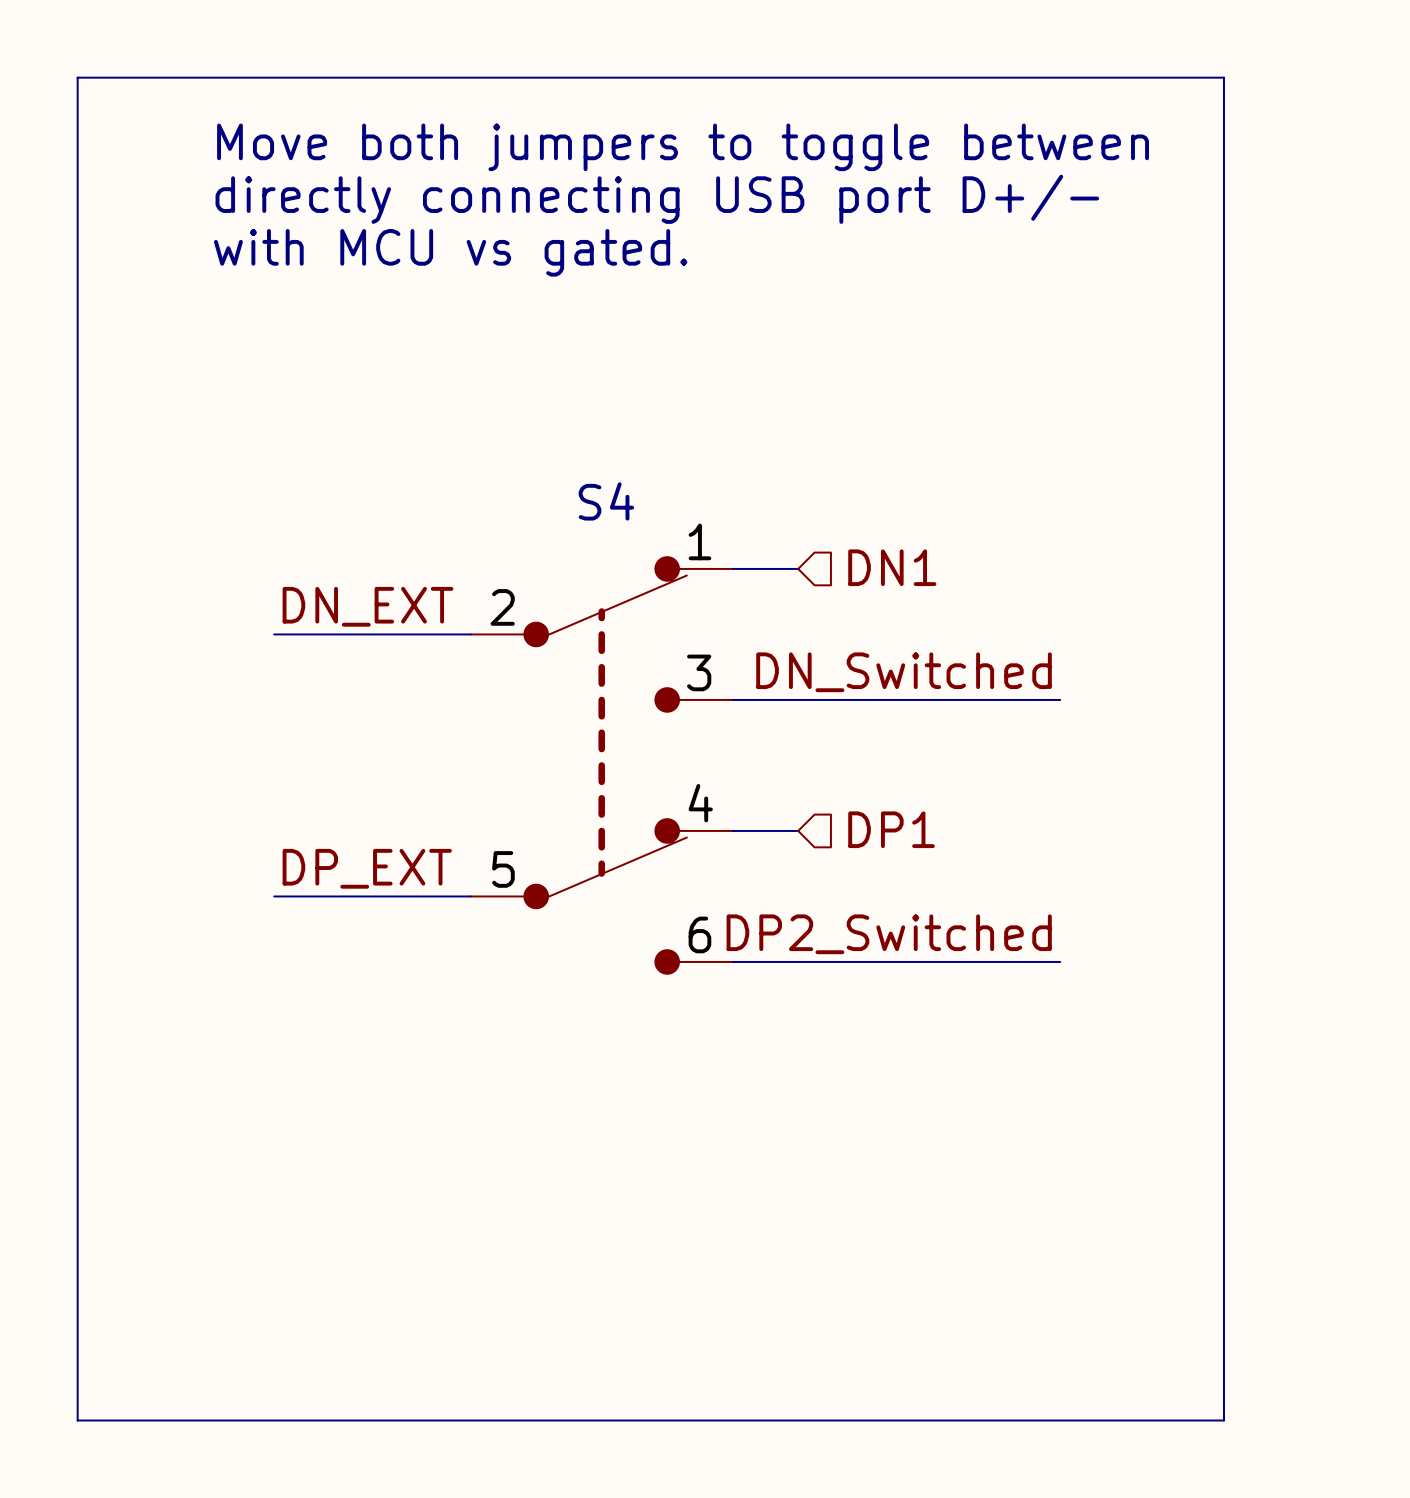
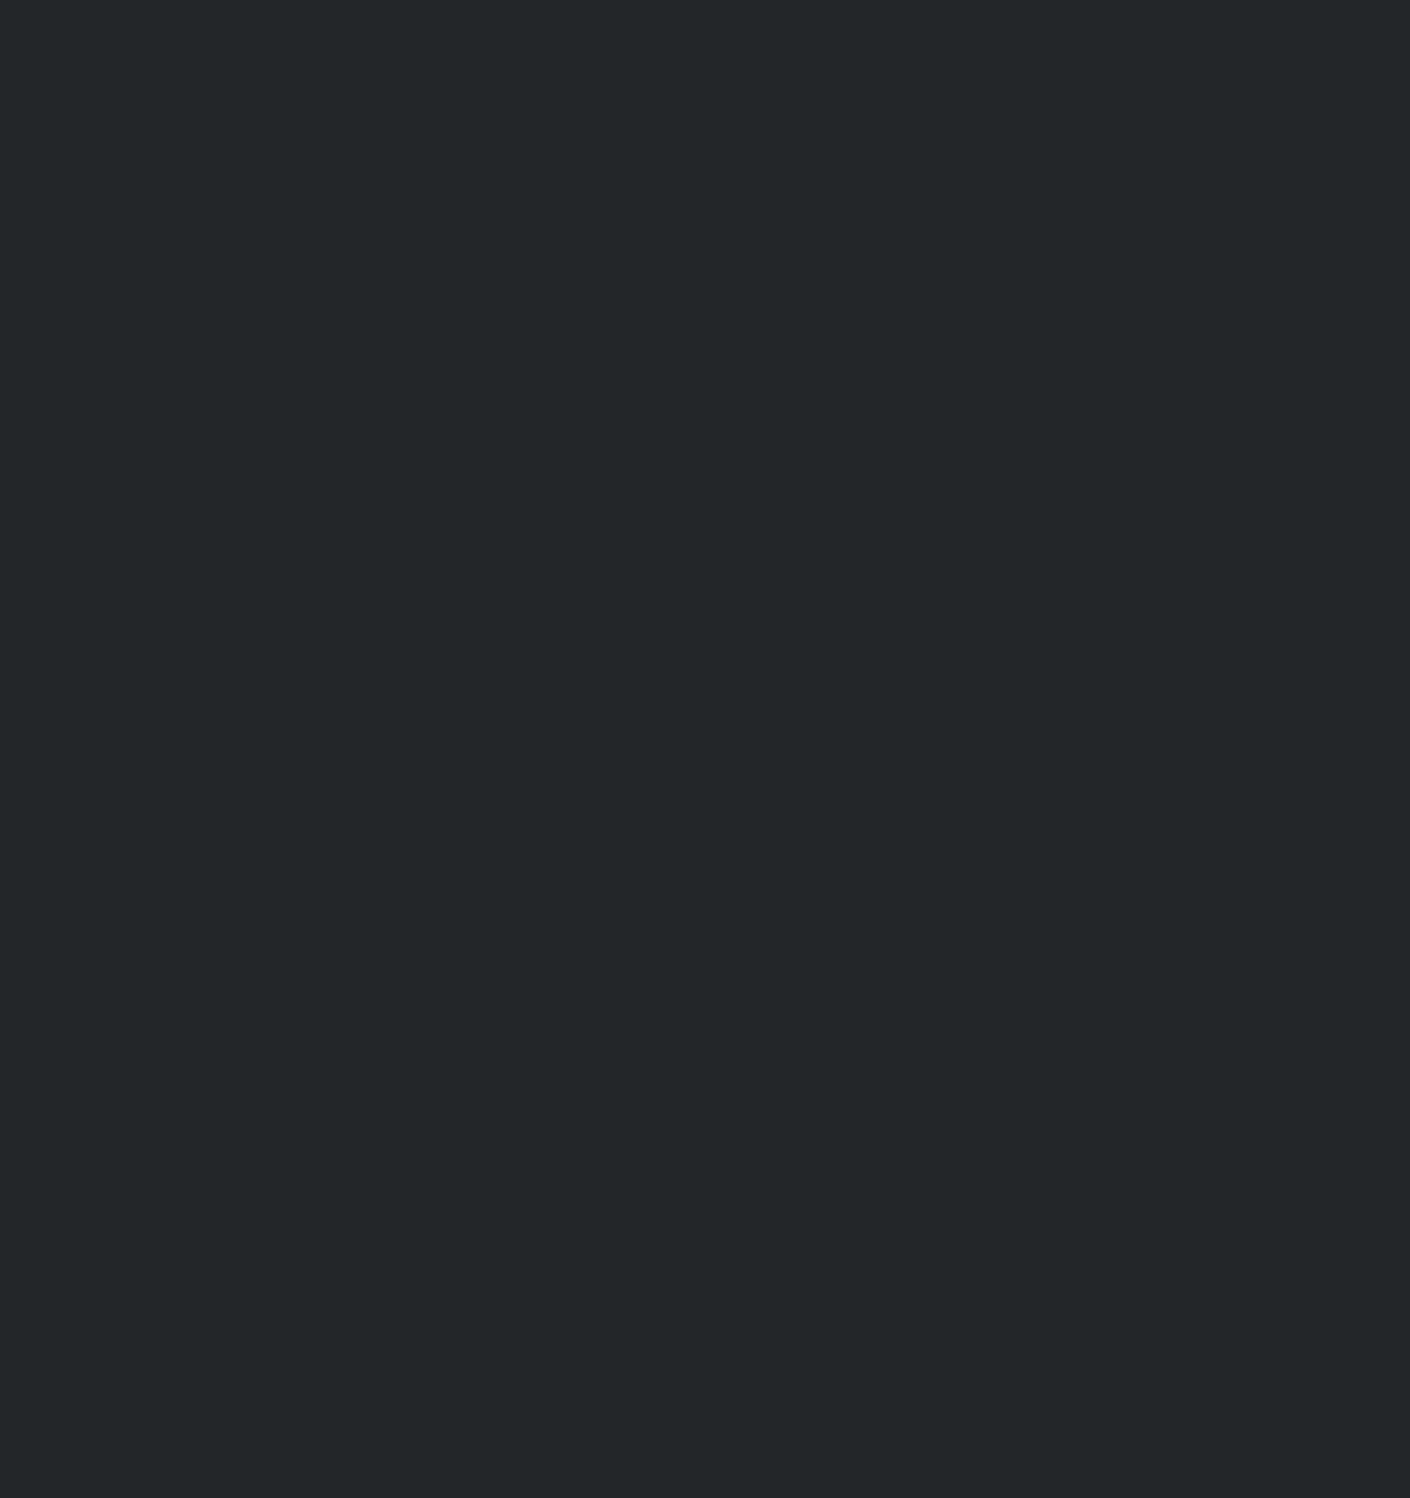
line: (77, 77) (77, 1420) (1223, 1420) (1223, 77) (77, 77) -> none
text: Move both jumpers to toggle between (683, 147) -> none
text: directly connecting USB port D+/- (657, 199) -> none
text: with MCU vs gated. (450, 252) -> none
hierarchical label: DN1 (892, 567) -> none
wire: (732, 568) (798, 568) -> none
label: DN_EXT (368, 606) -> none
wire: (274, 634) (470, 634) -> none
label: DN_Switched (904, 672) -> none
wire: (732, 699) (1060, 699) -> none
S4: (601, 765) -> none
hierarchical label: DP1 (891, 829) -> none
wire: (732, 830) (798, 830) -> none
label: DP_EXT (367, 868) -> none
wire: (274, 896) (470, 896) -> none
label: DP2_Switched (889, 934) -> none
wire: (732, 961) (1060, 961) -> none

